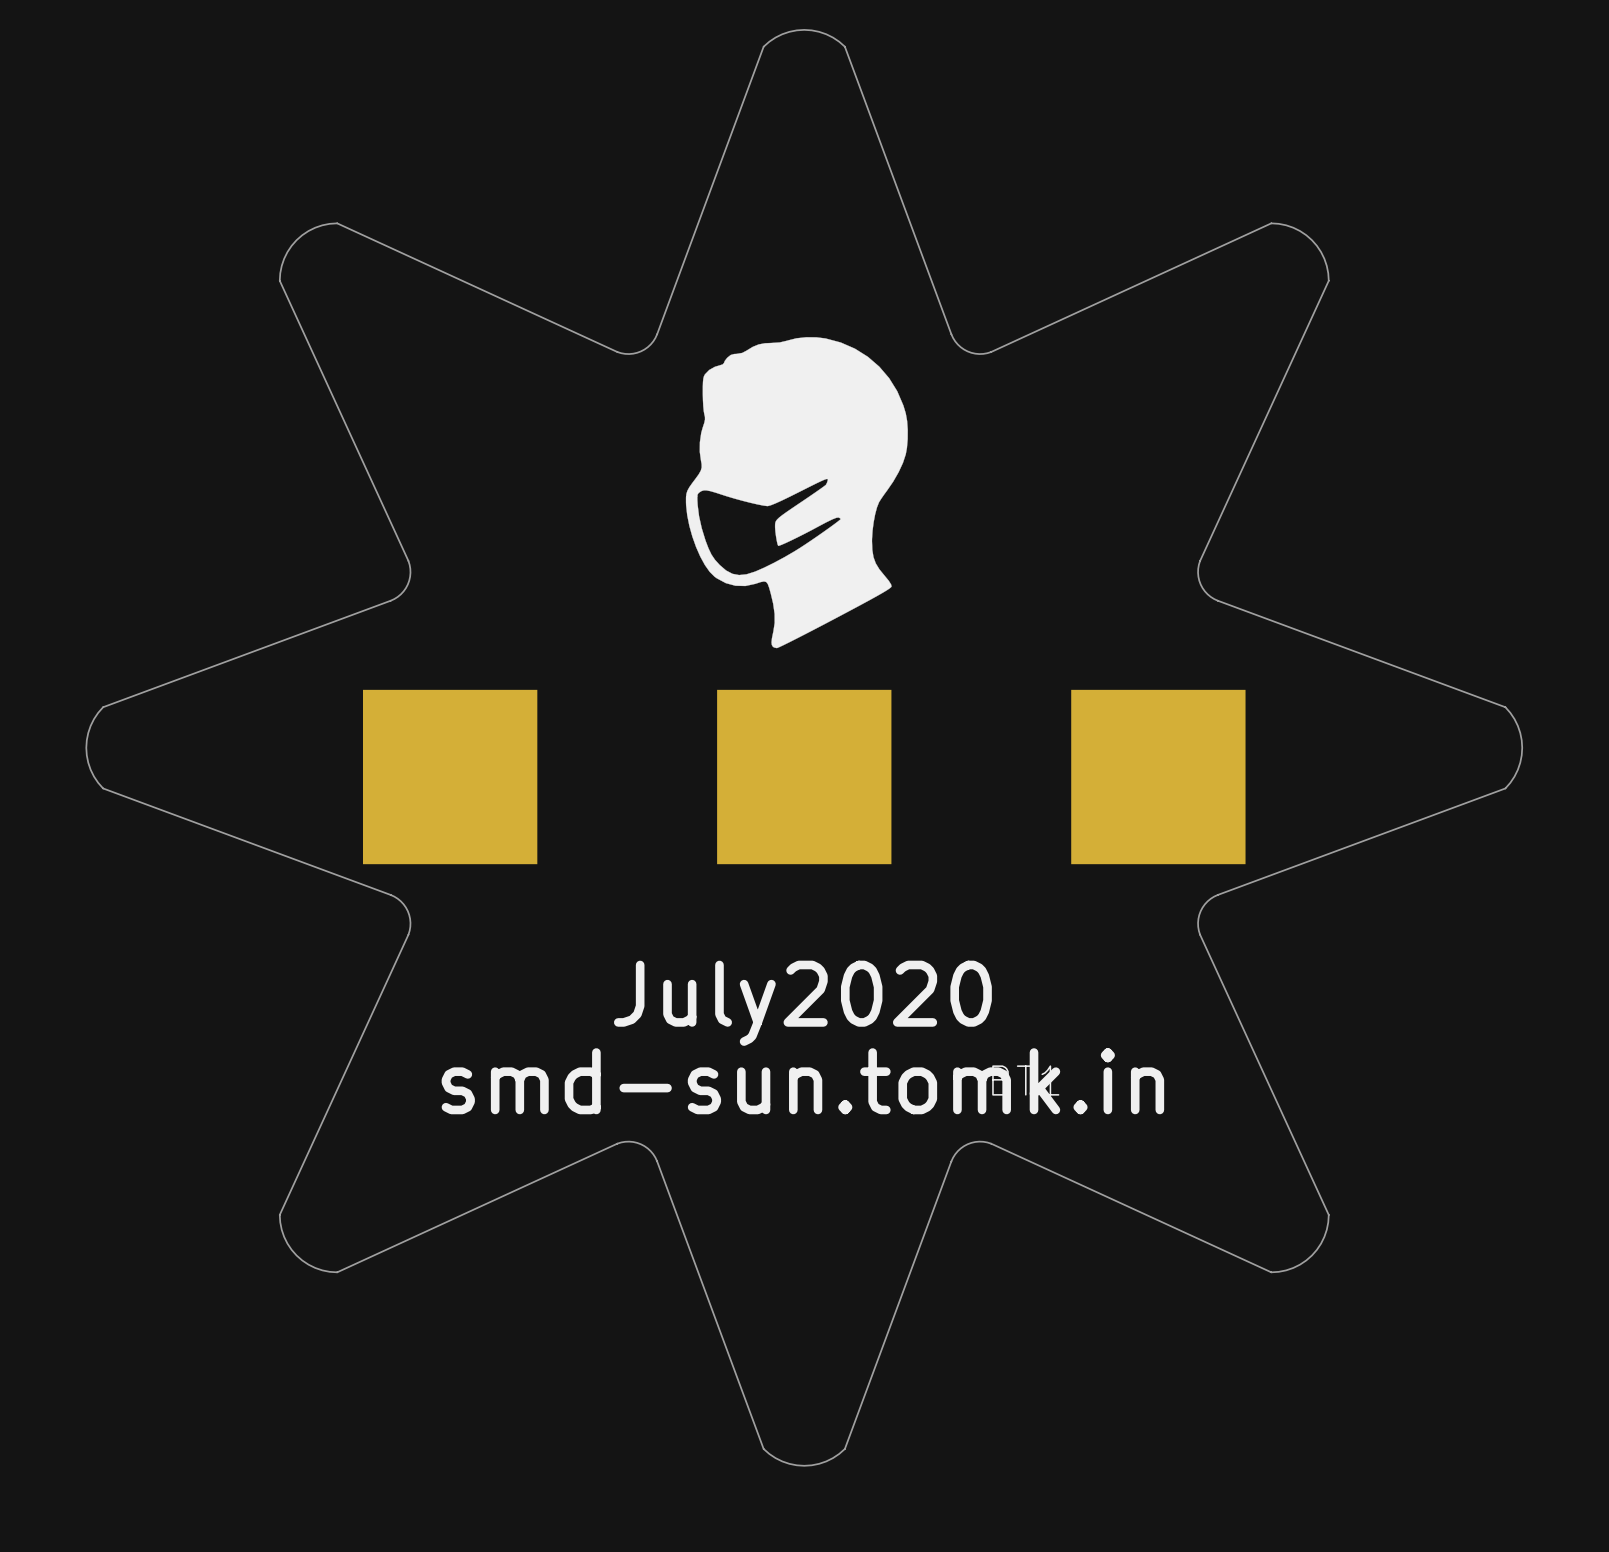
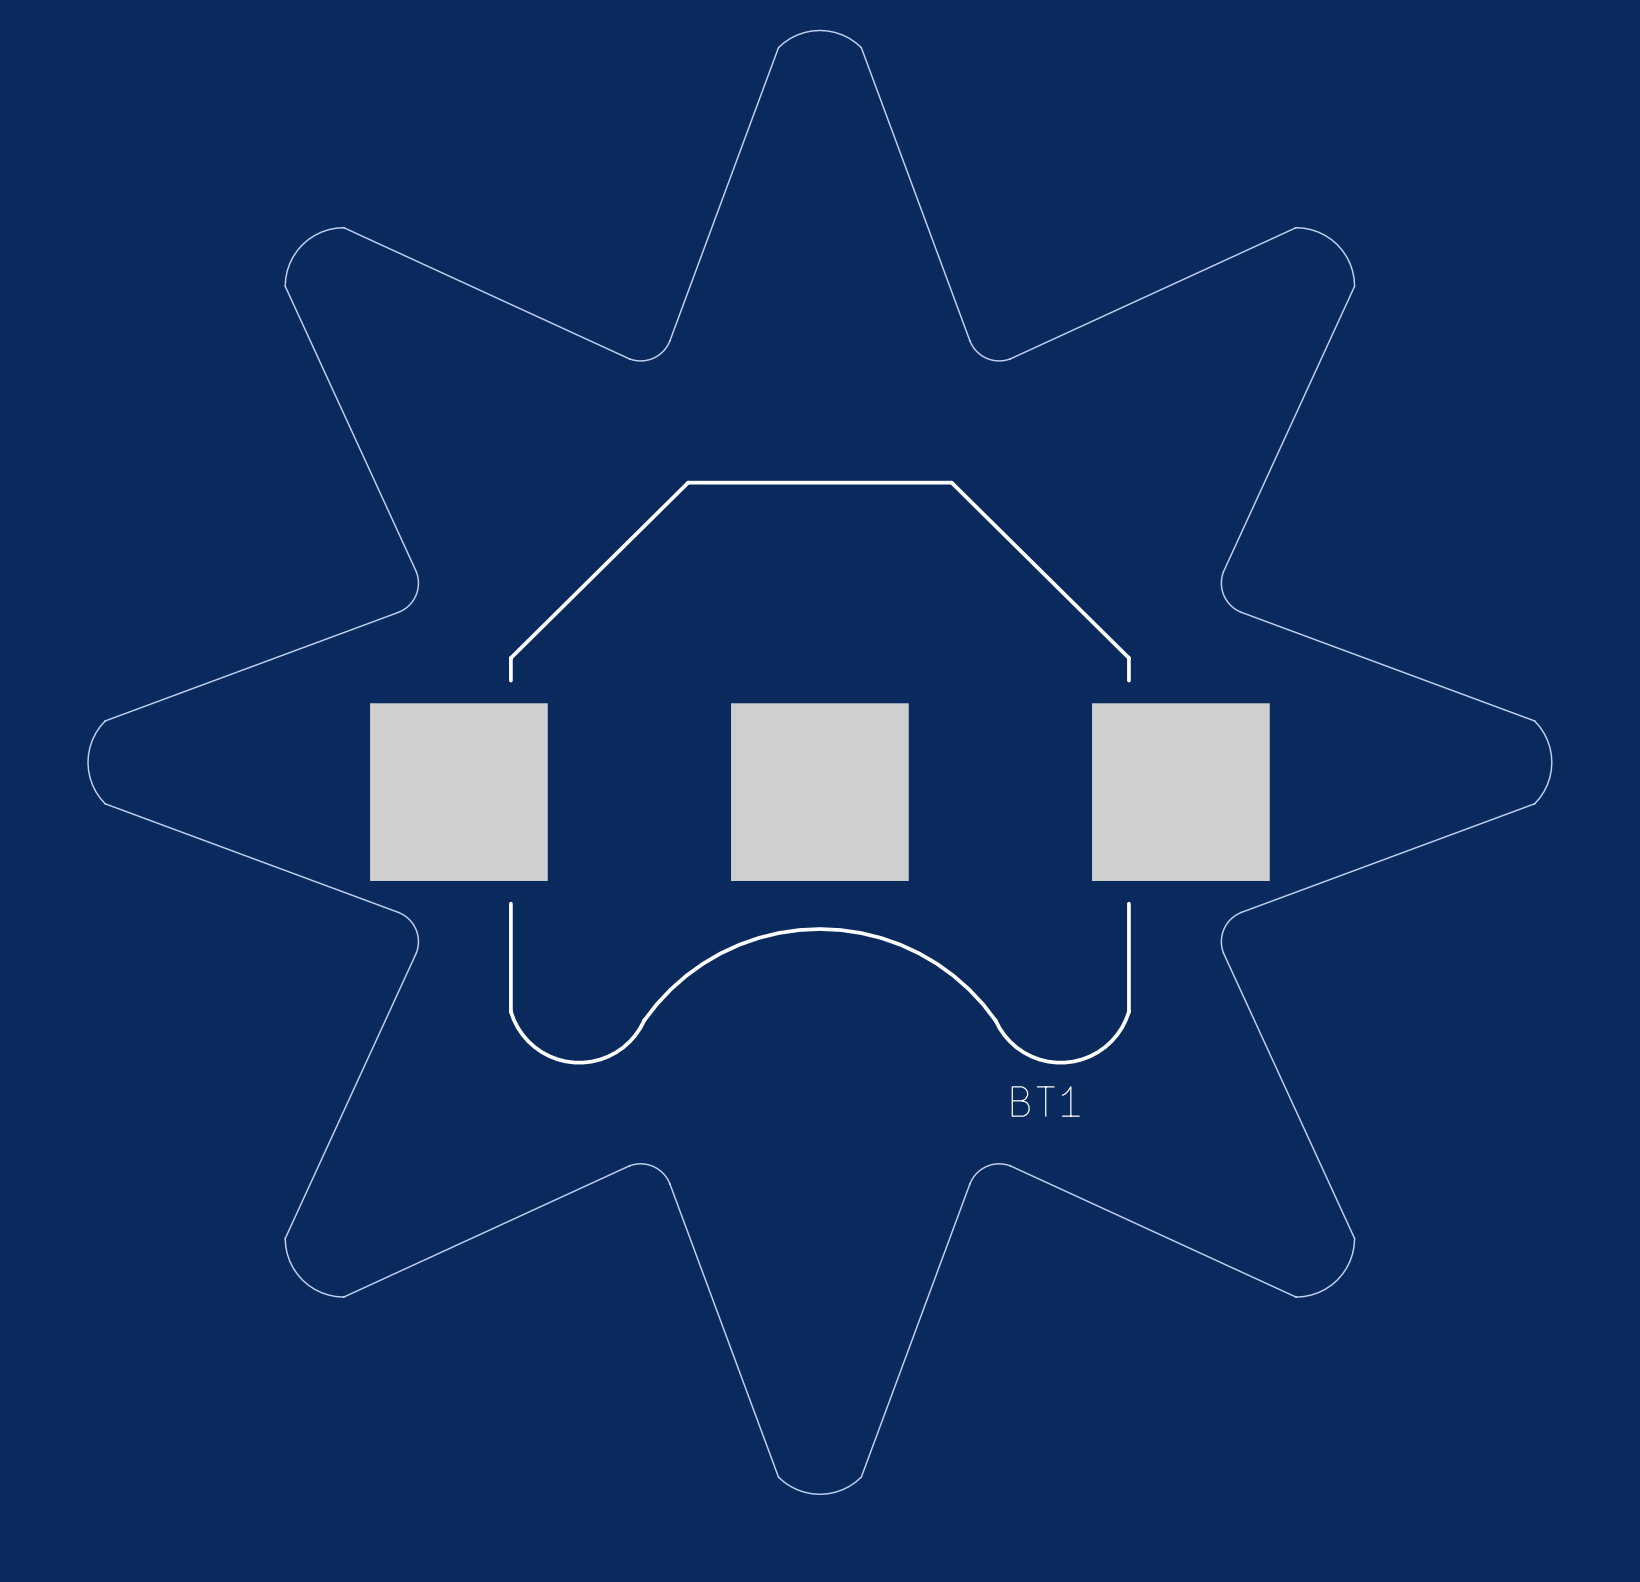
drawing: [685, 337, 908, 649] -> none
BT1 footprint: [363, 689, 1246, 865] -> [370, 480, 1270, 1065]
text: July2020 (802, 1003) -> none
text: smd-sun.tomk.in (802, 1081) -> none

